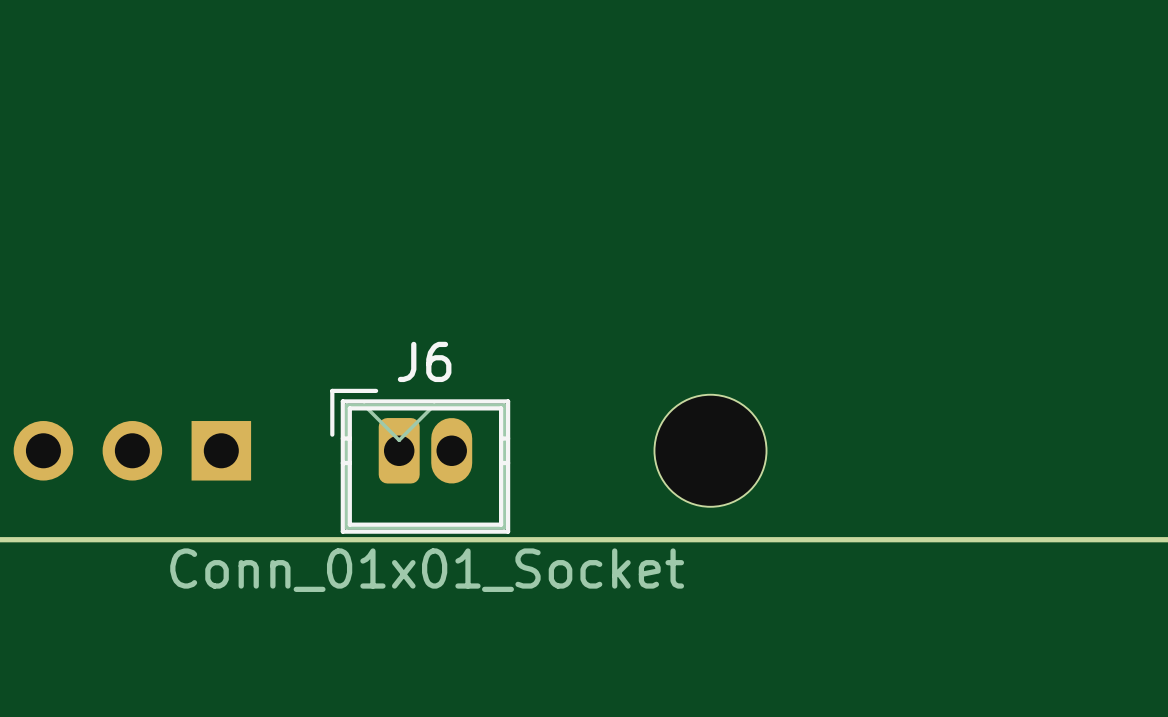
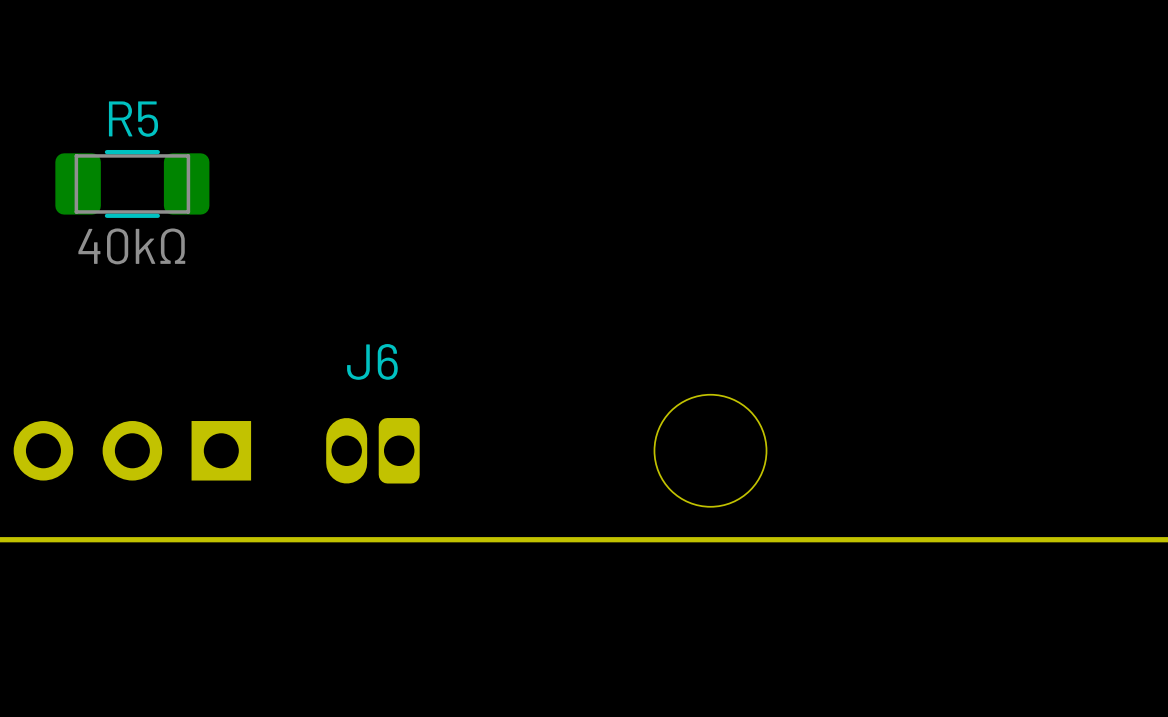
R5: none -> 40kΩ (132, 183)
J6 side: bottom (420, 461) -> top (372, 450)

